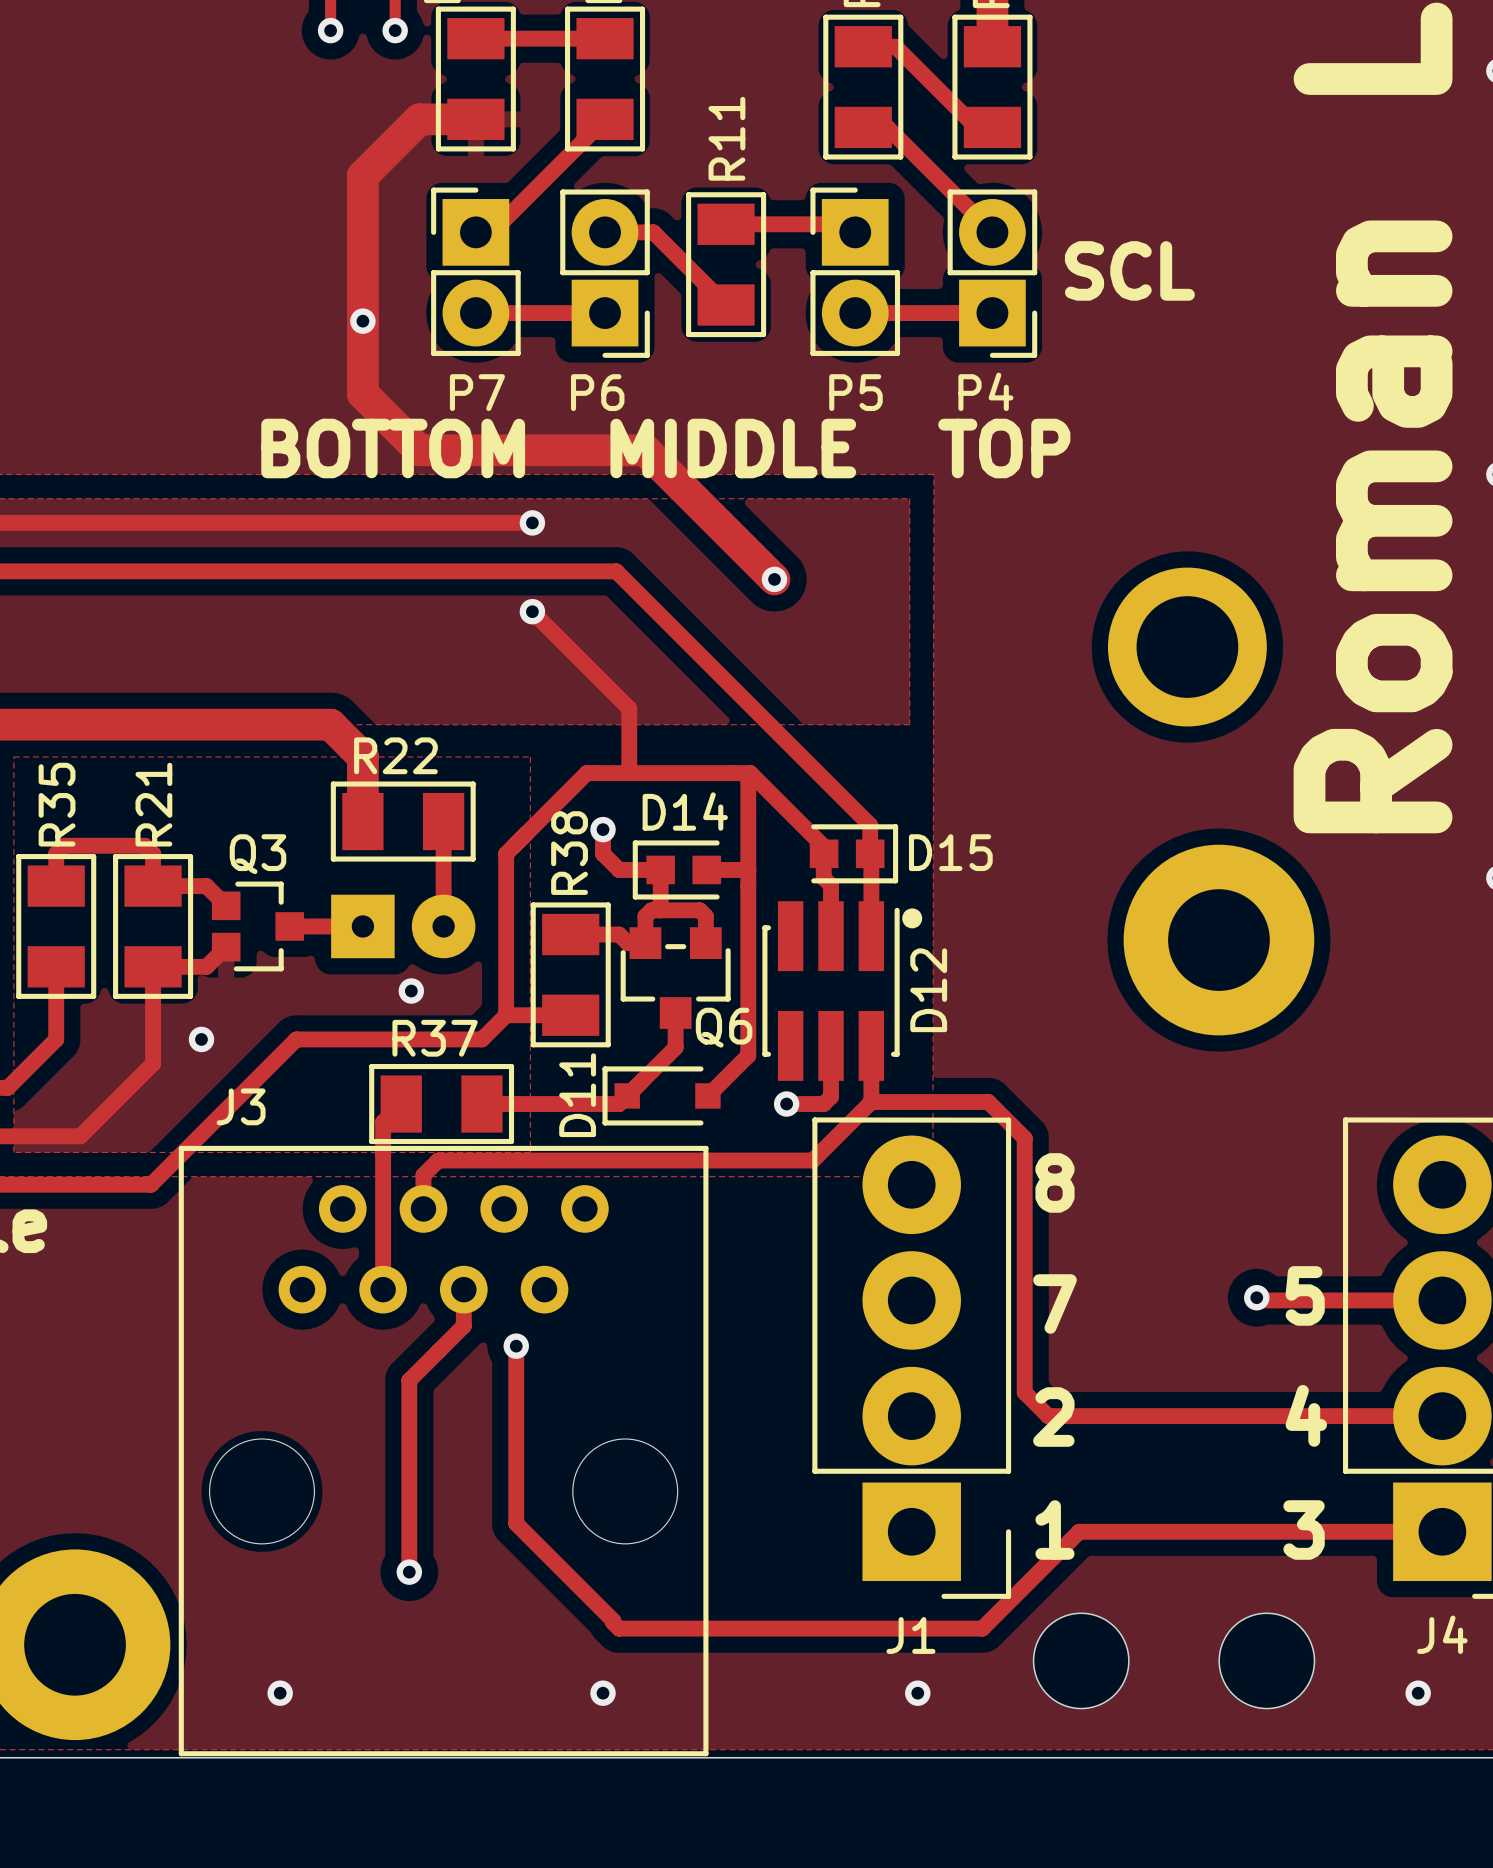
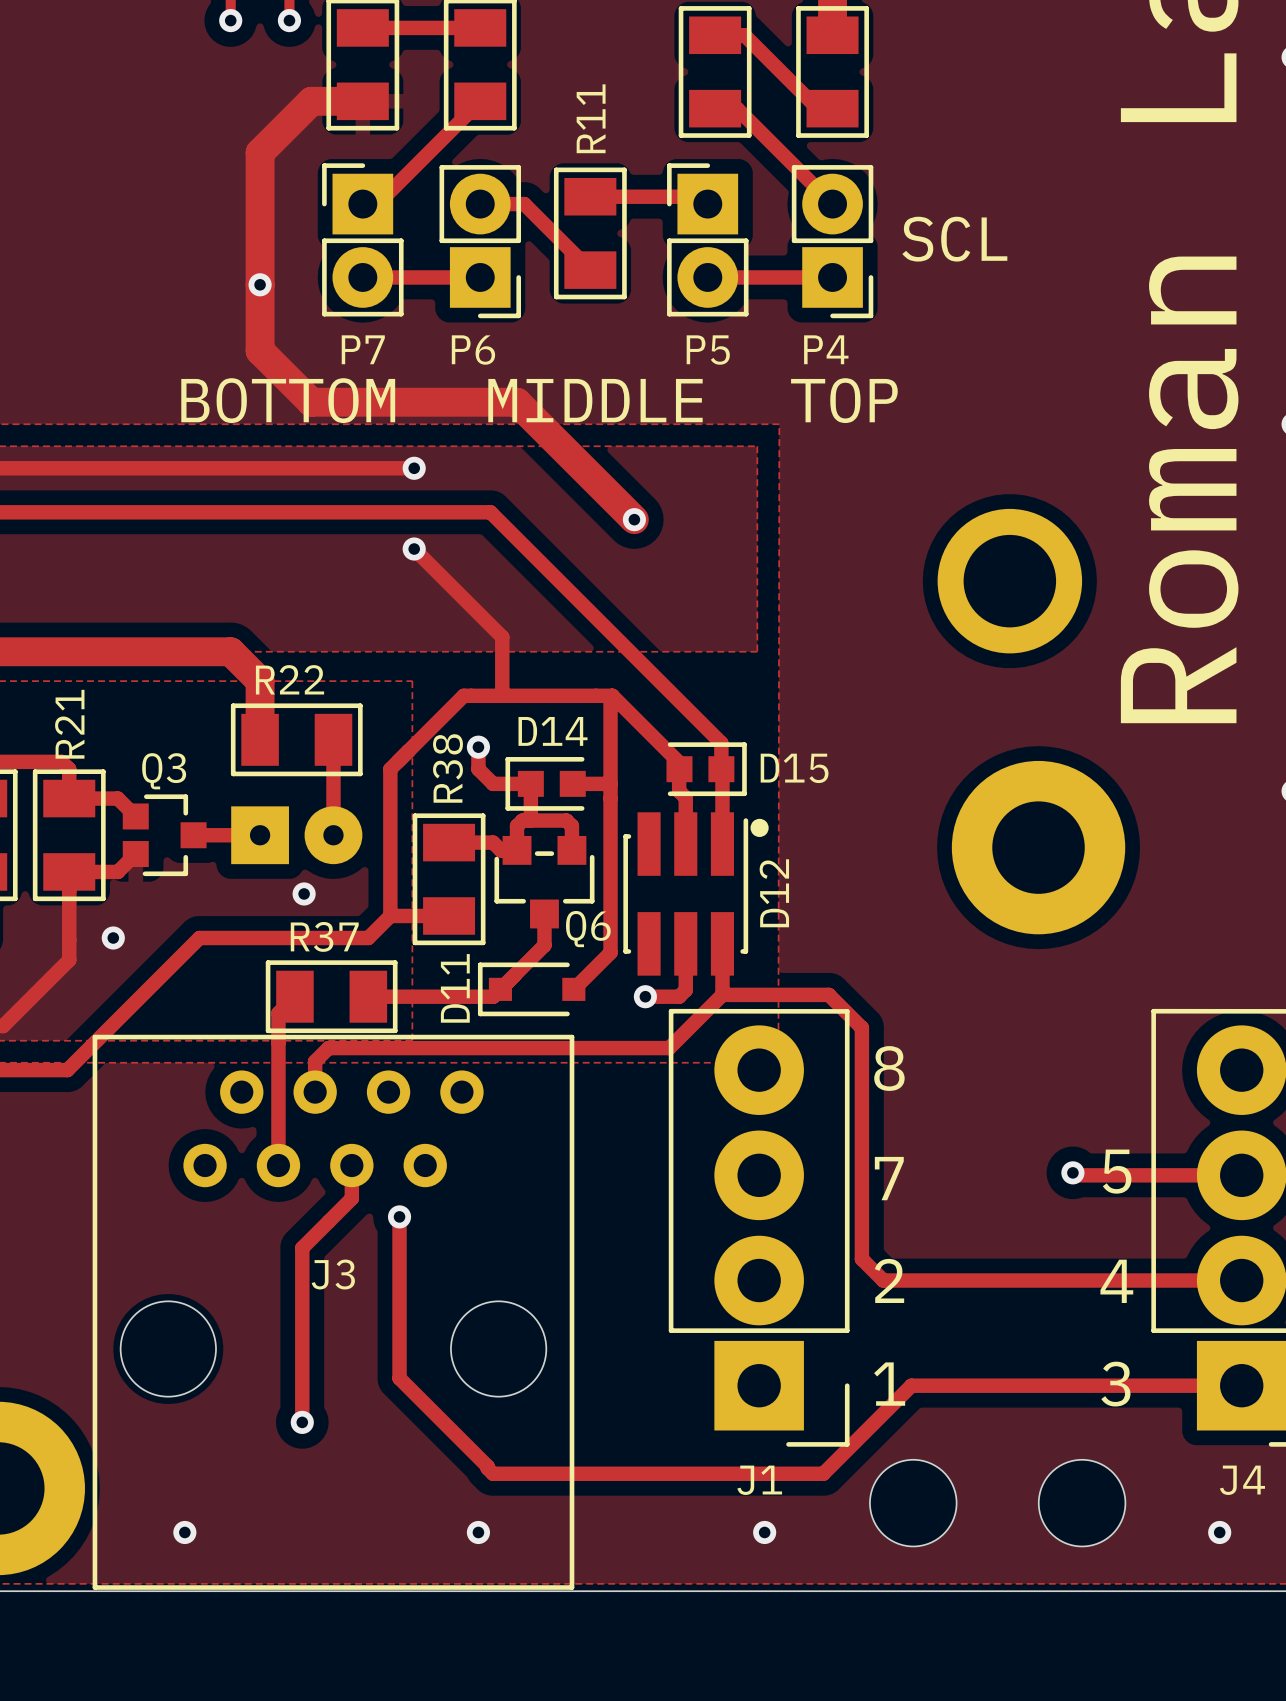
J3 name position: J3 (241, 1106) -> J3 (333, 1274)

